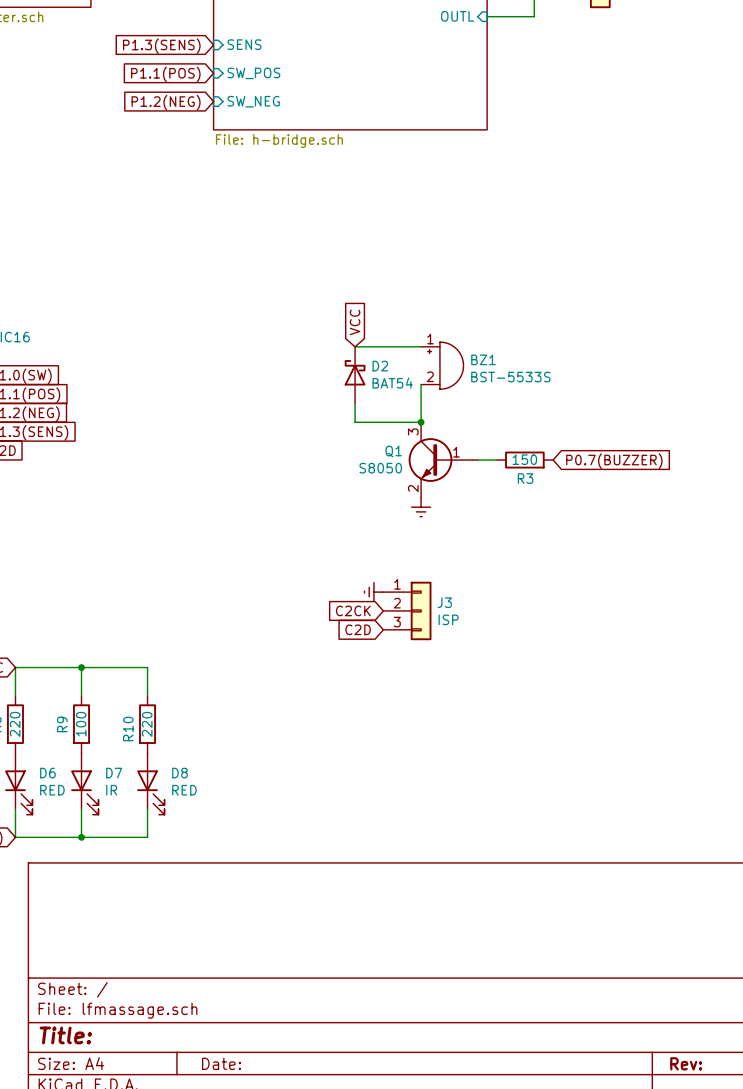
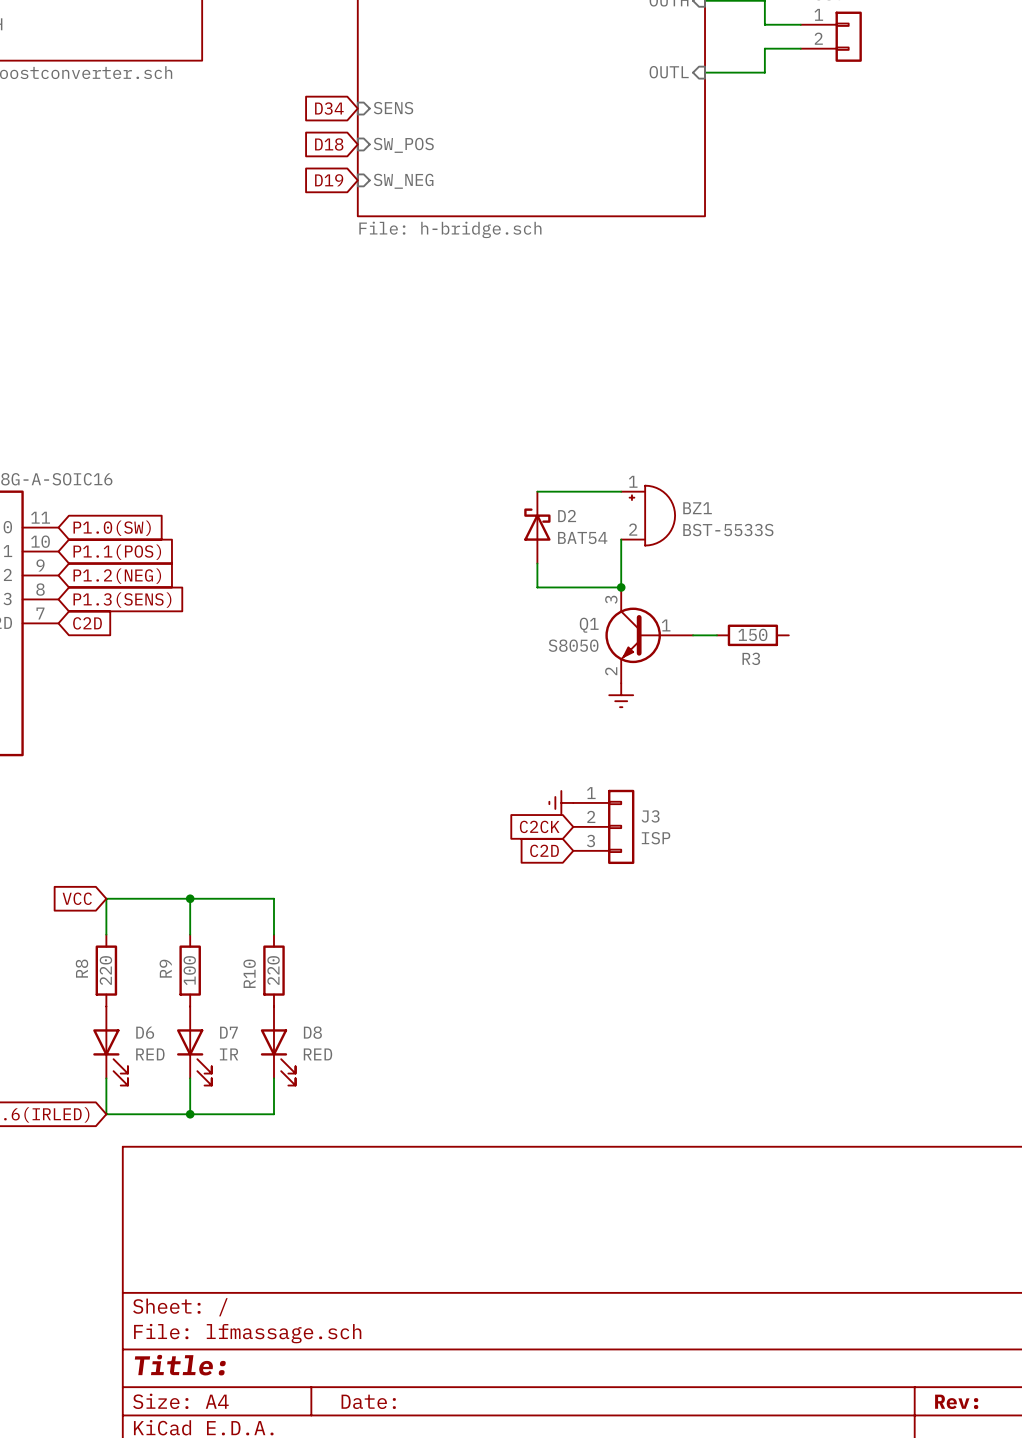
global label: P1.3(SENS) (161, 46) -> D34 (329, 108)
global label: P1.1(POS) (165, 74) -> D18 (329, 144)
global label: P1.2(NEG) (166, 102) -> D19 (329, 180)
global label: VCC (355, 322) -> none
global label: P0.7(BUZZER) (614, 461) -> none

